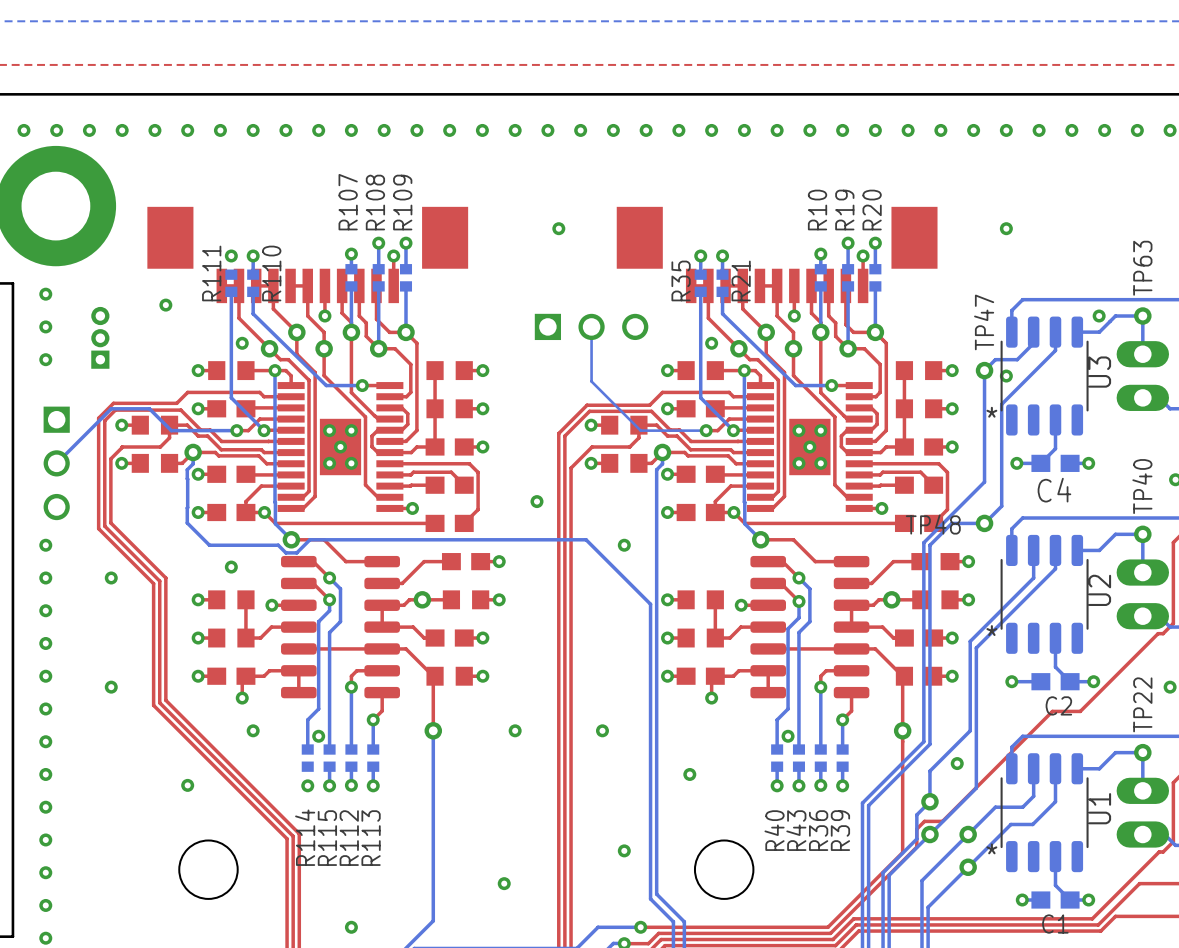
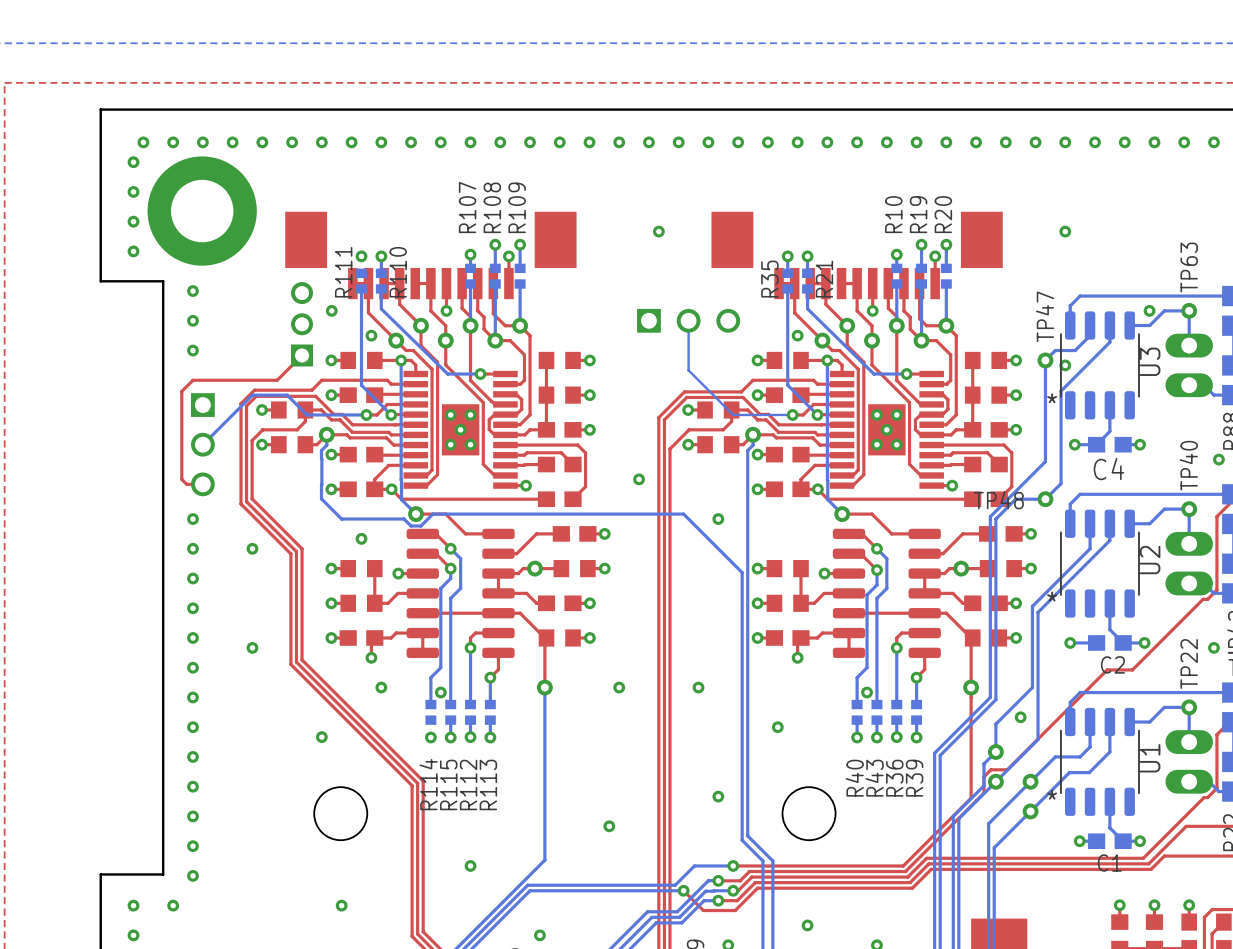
via position: (165, 305) -> (331, 310)
part: none -> (302, 324)
part: (100, 337) -> none
top track: none -> (302, 355) (277, 380) (192, 380) (181, 391) (181, 479) (186, 484) (202, 484)

